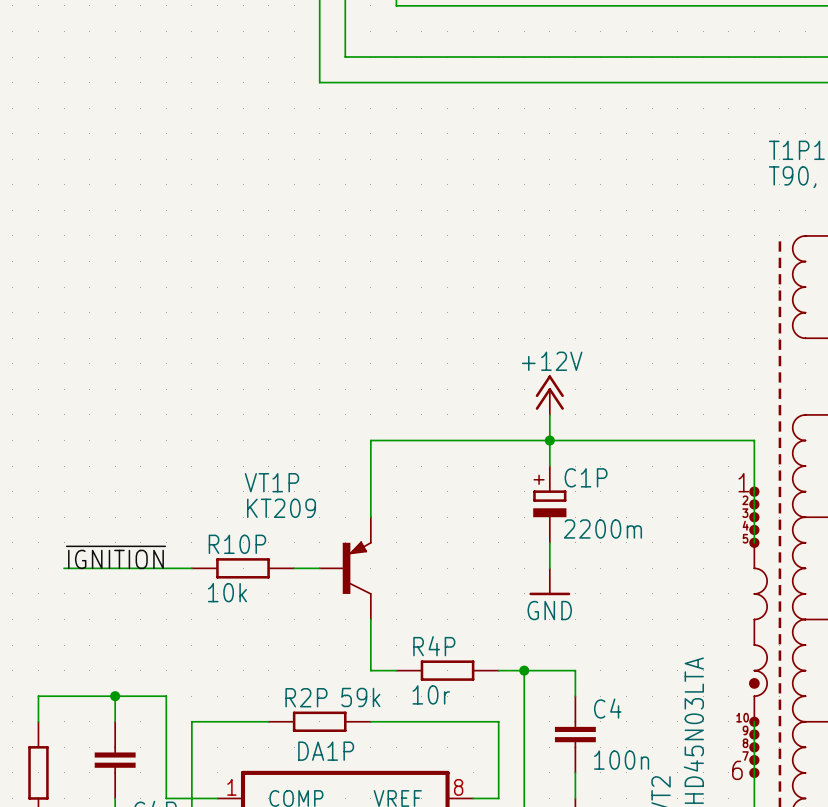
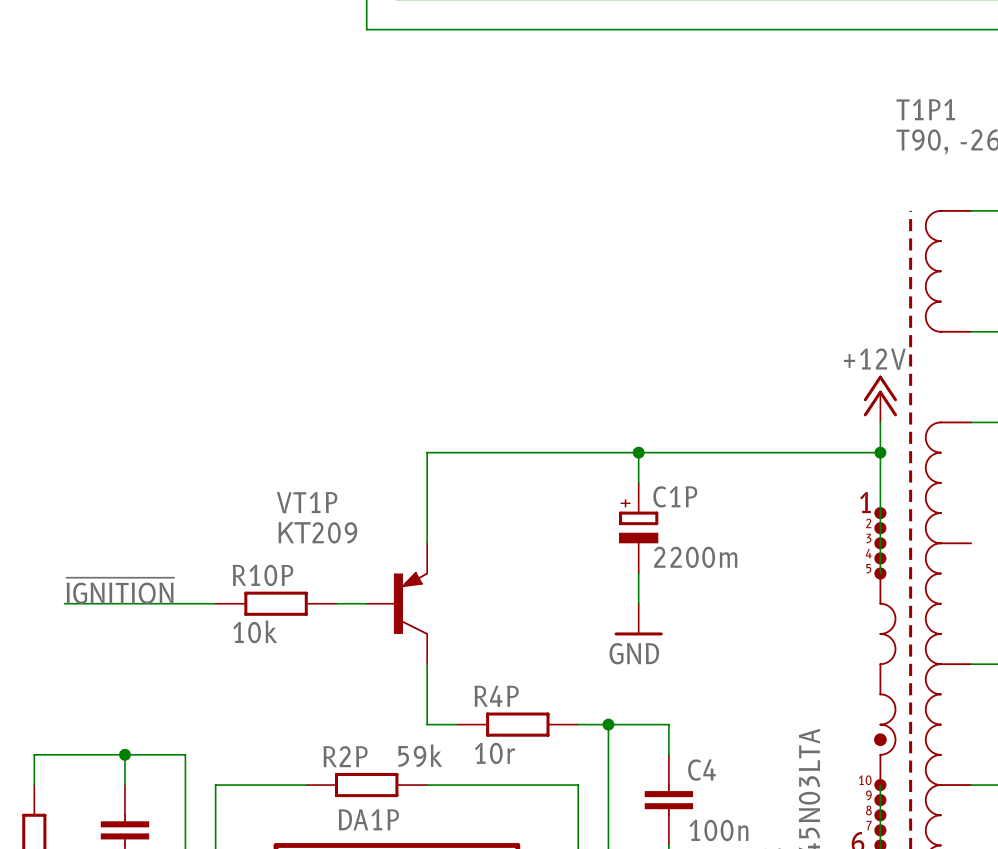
power symbol position: +12V (549, 395) -> +12V (880, 399)
wire: (549, 414) (549, 440) -> (880, 422) (880, 452)
junction: none -> (880, 452)

